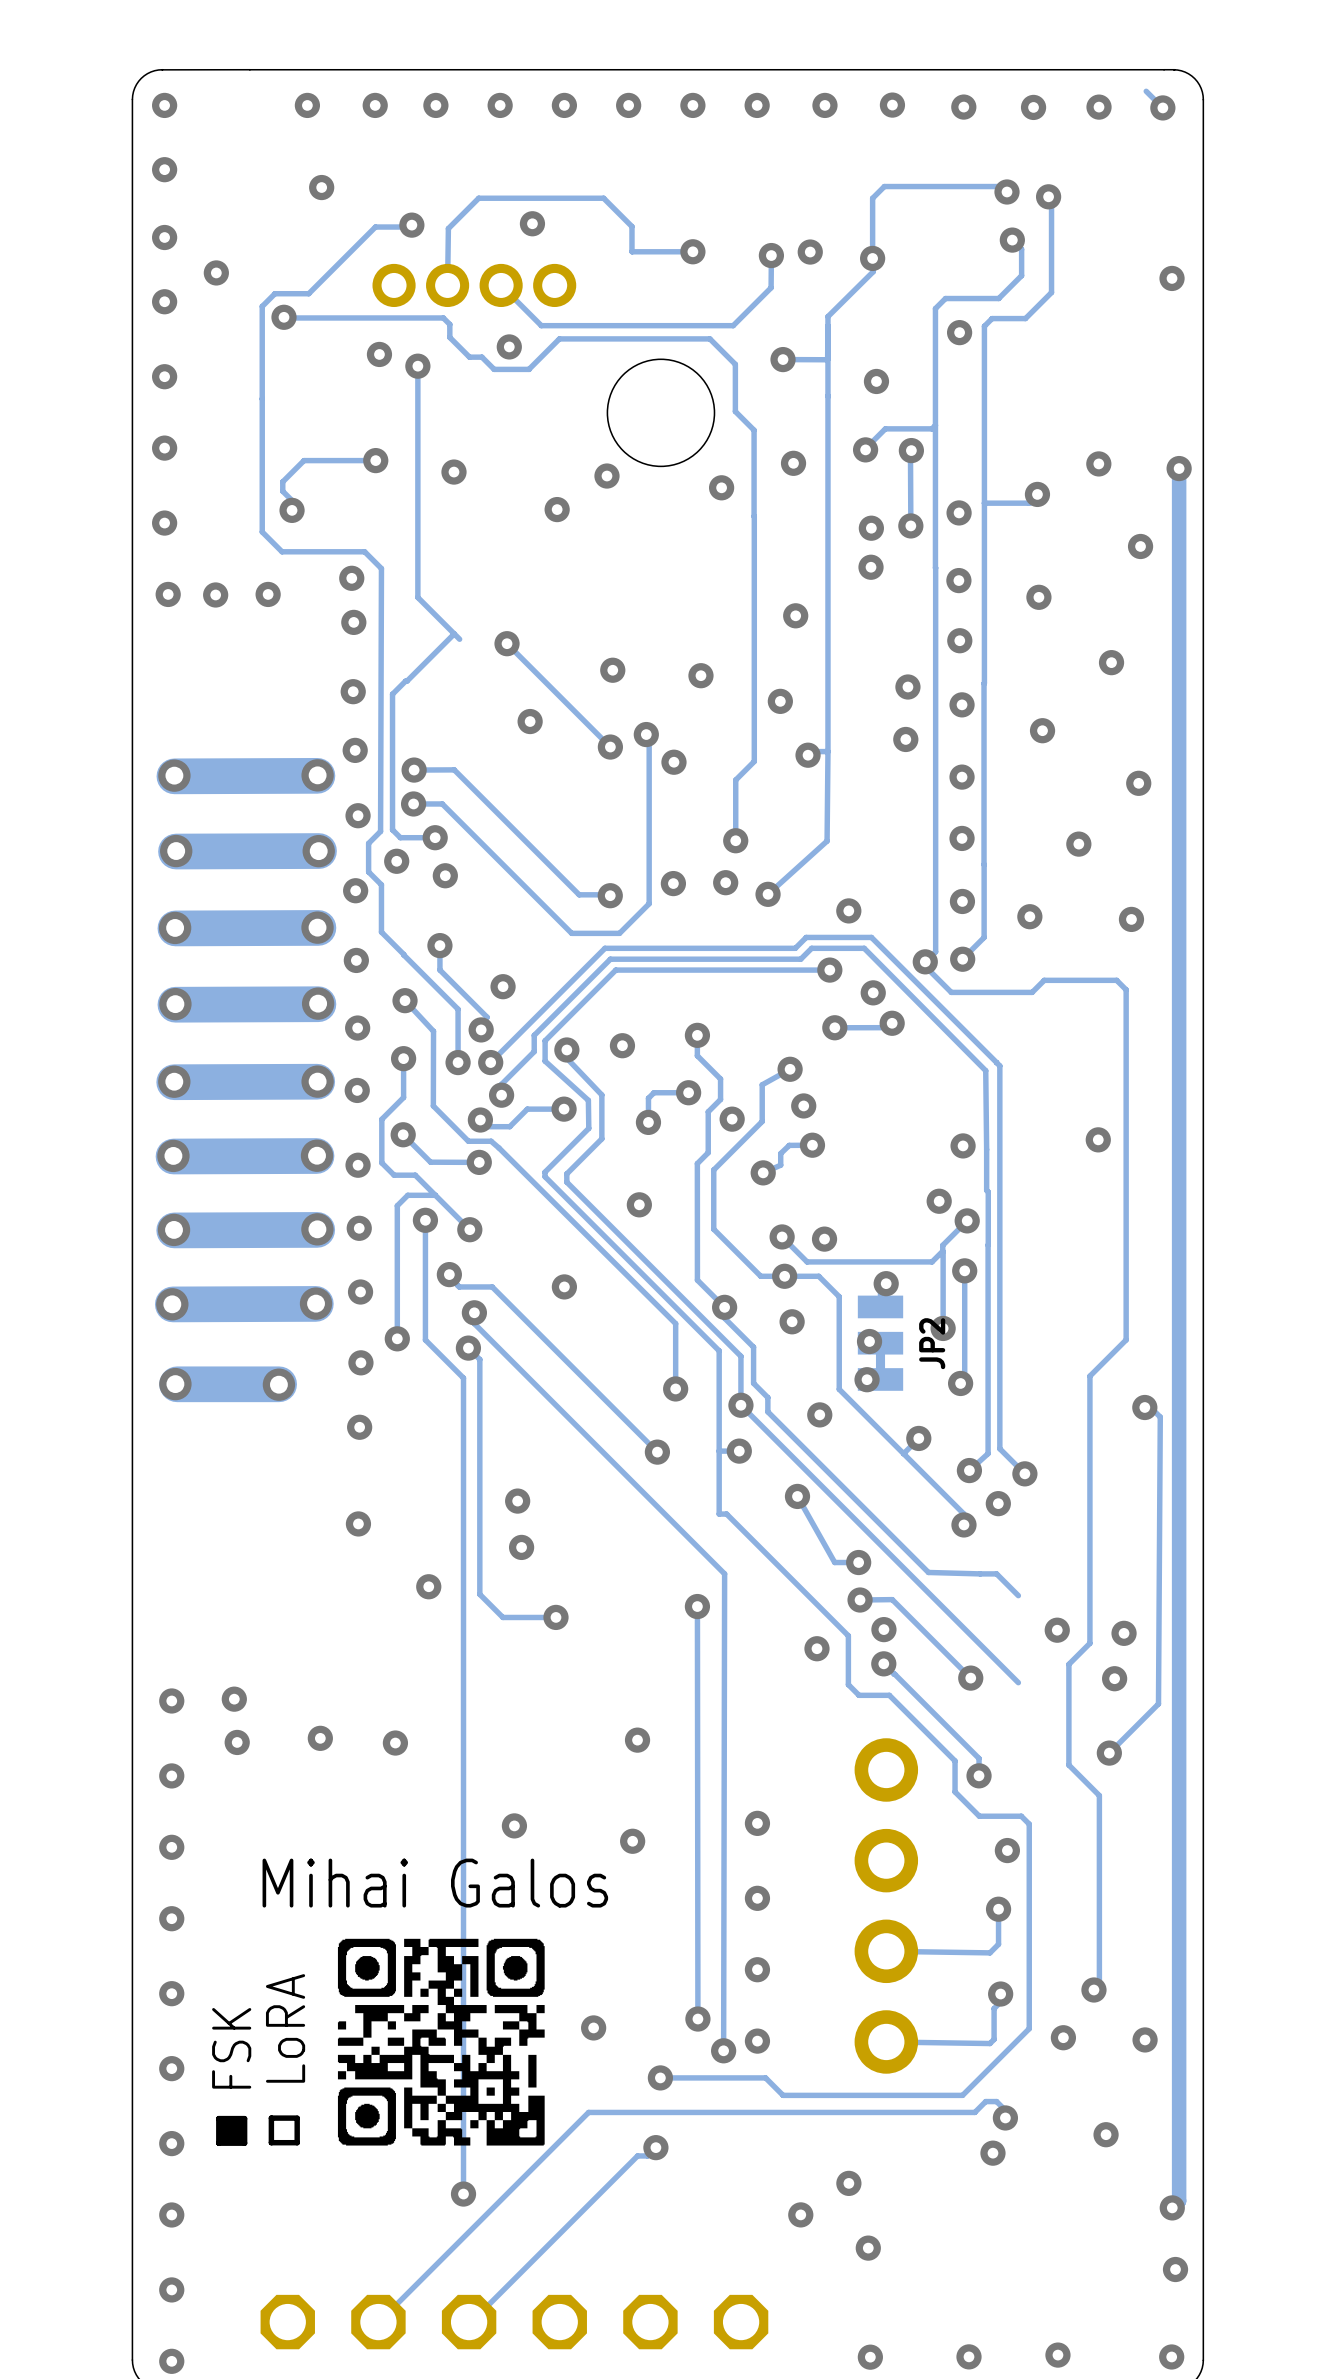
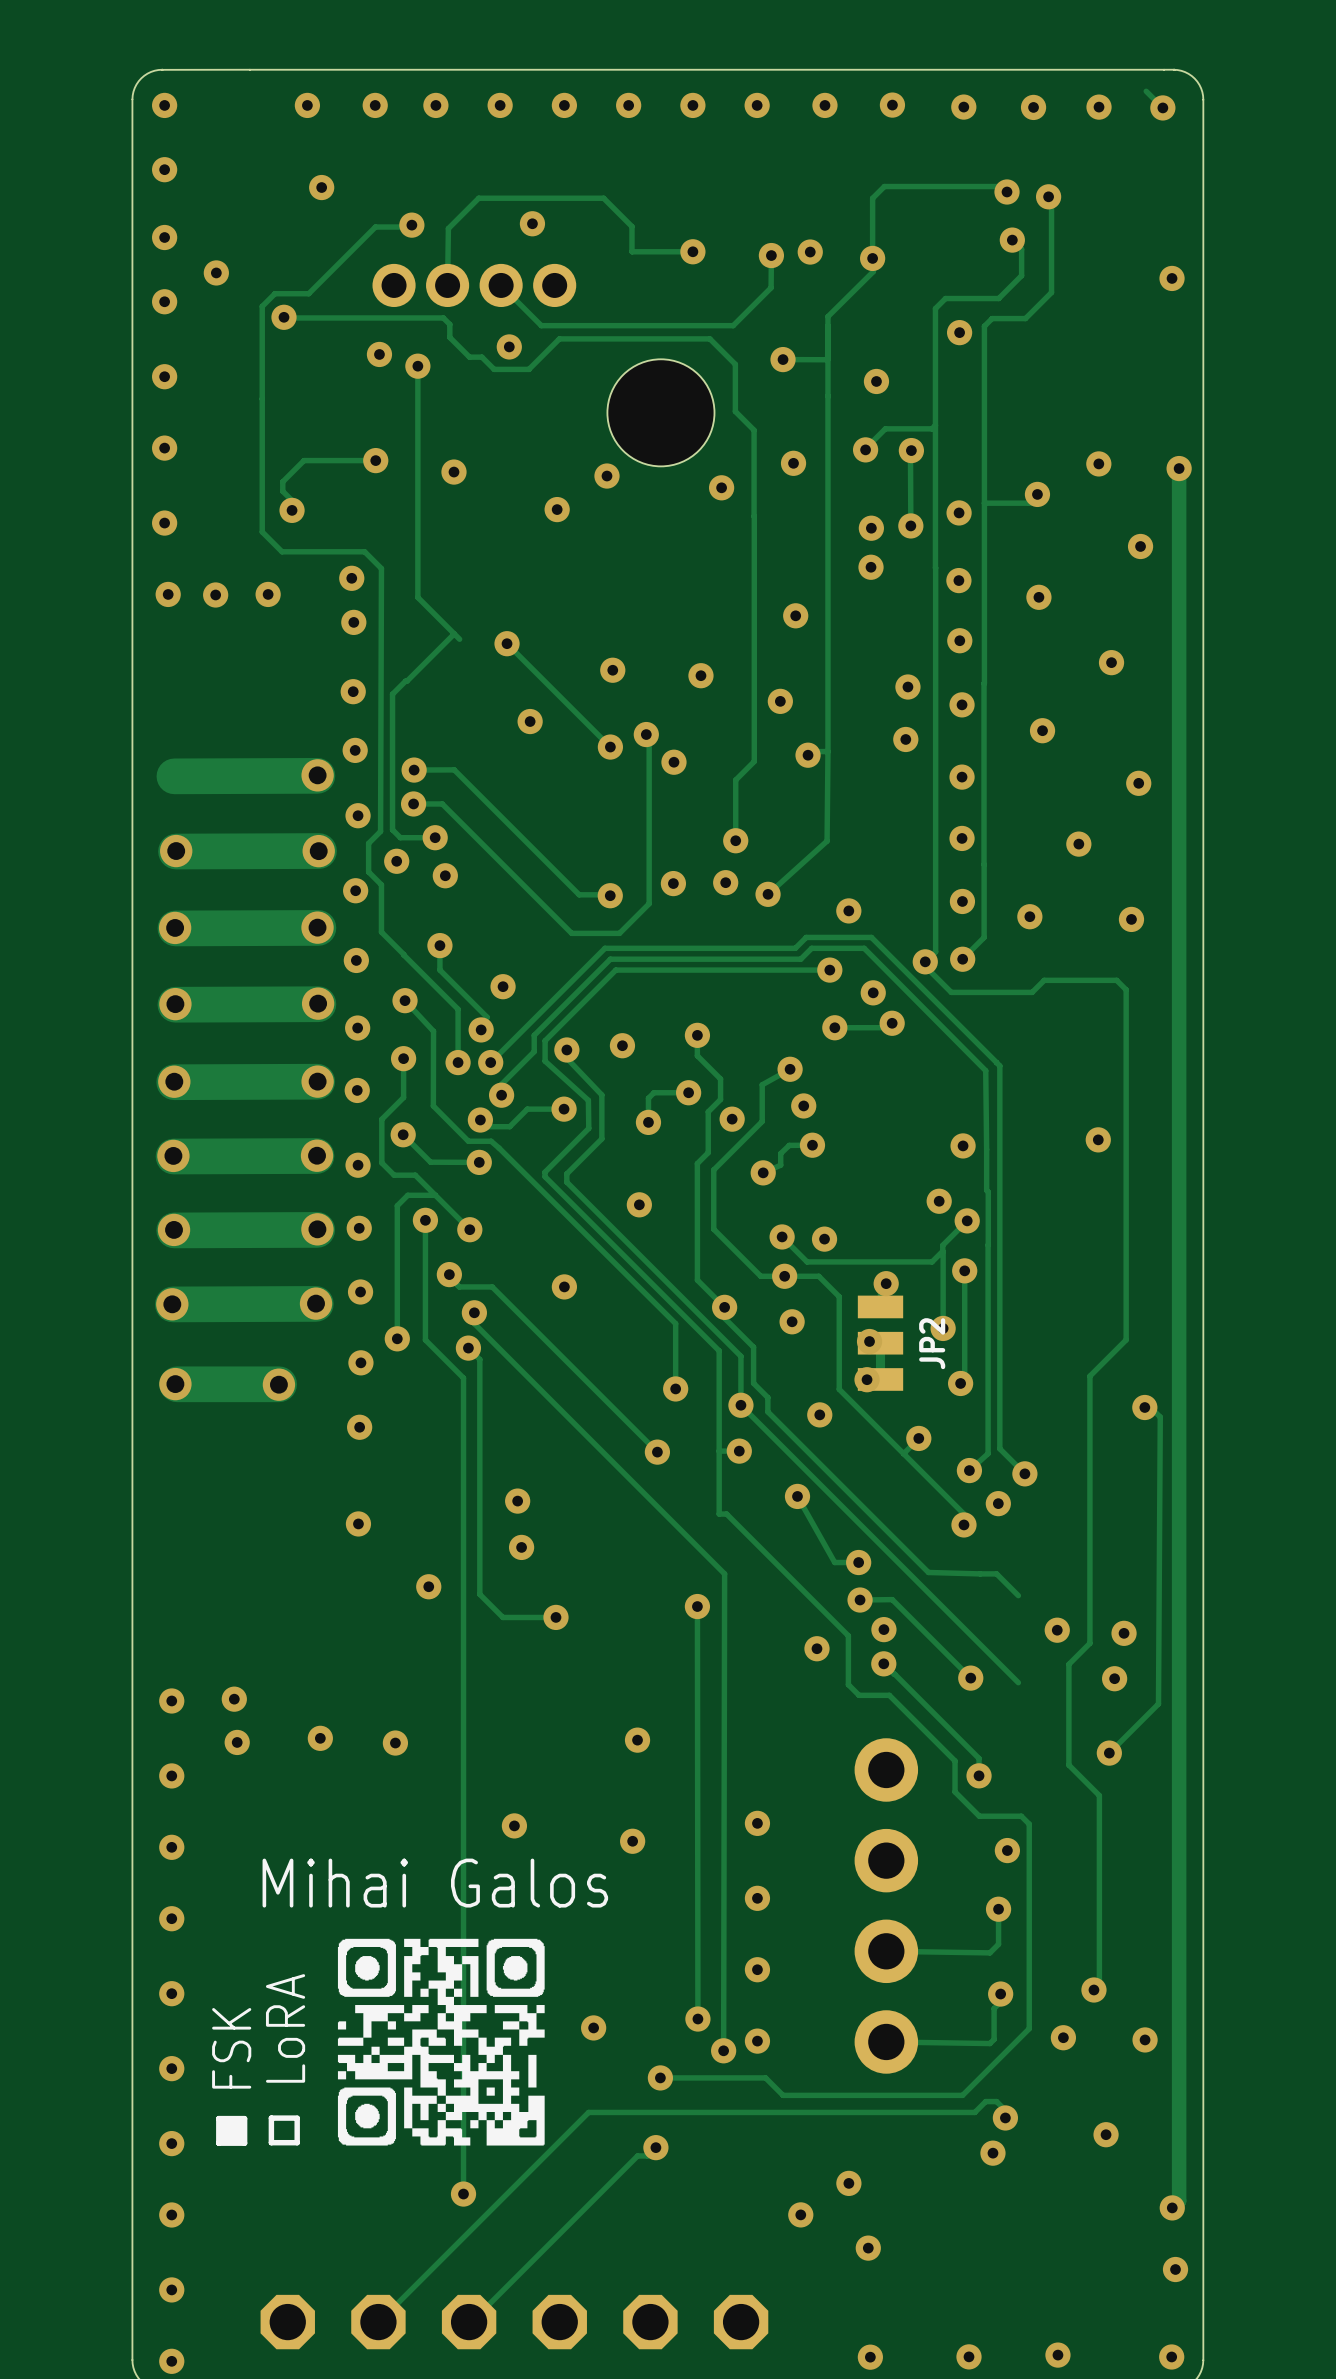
via: (174, 775) -> none

